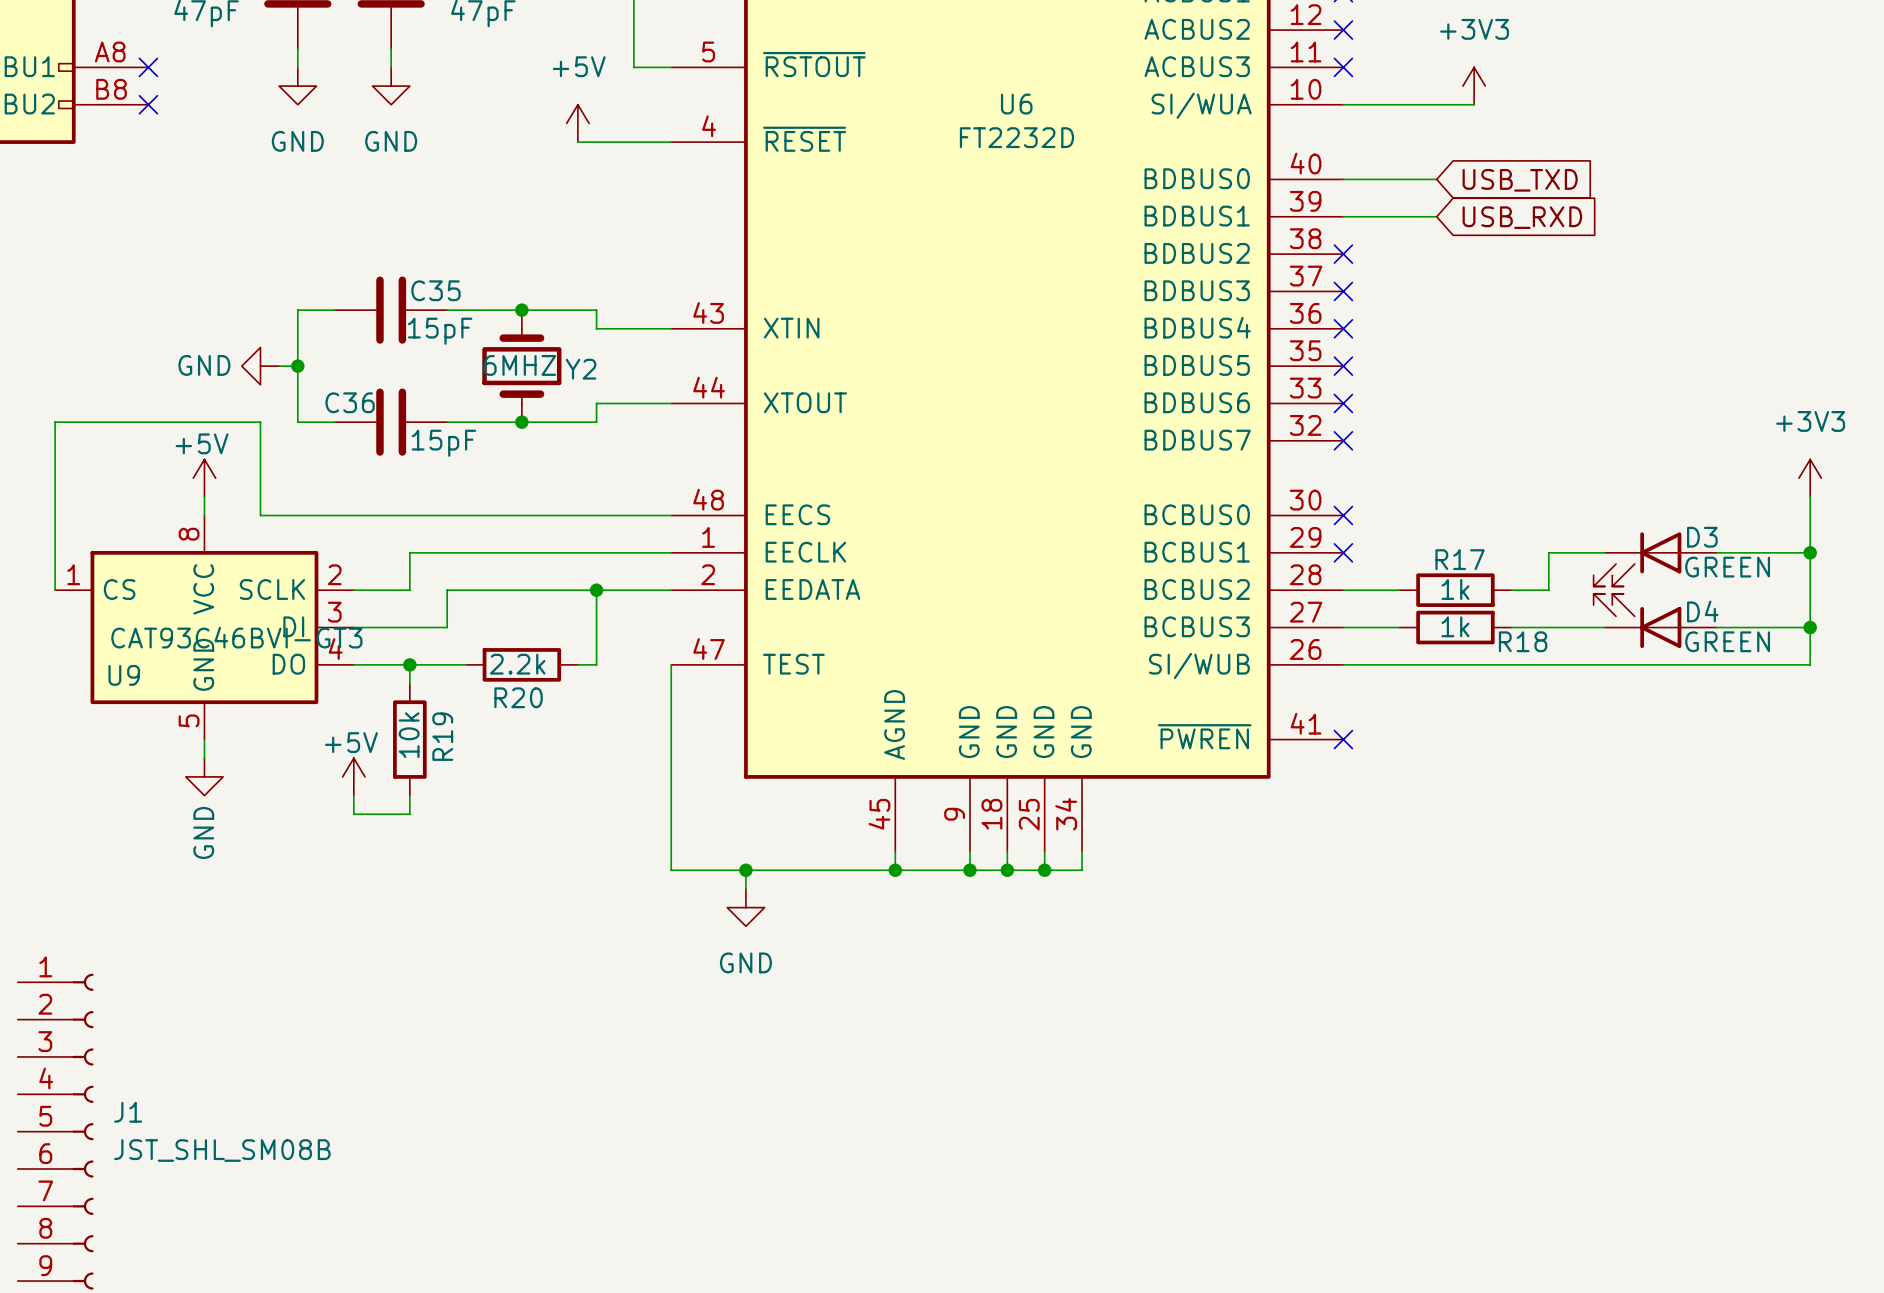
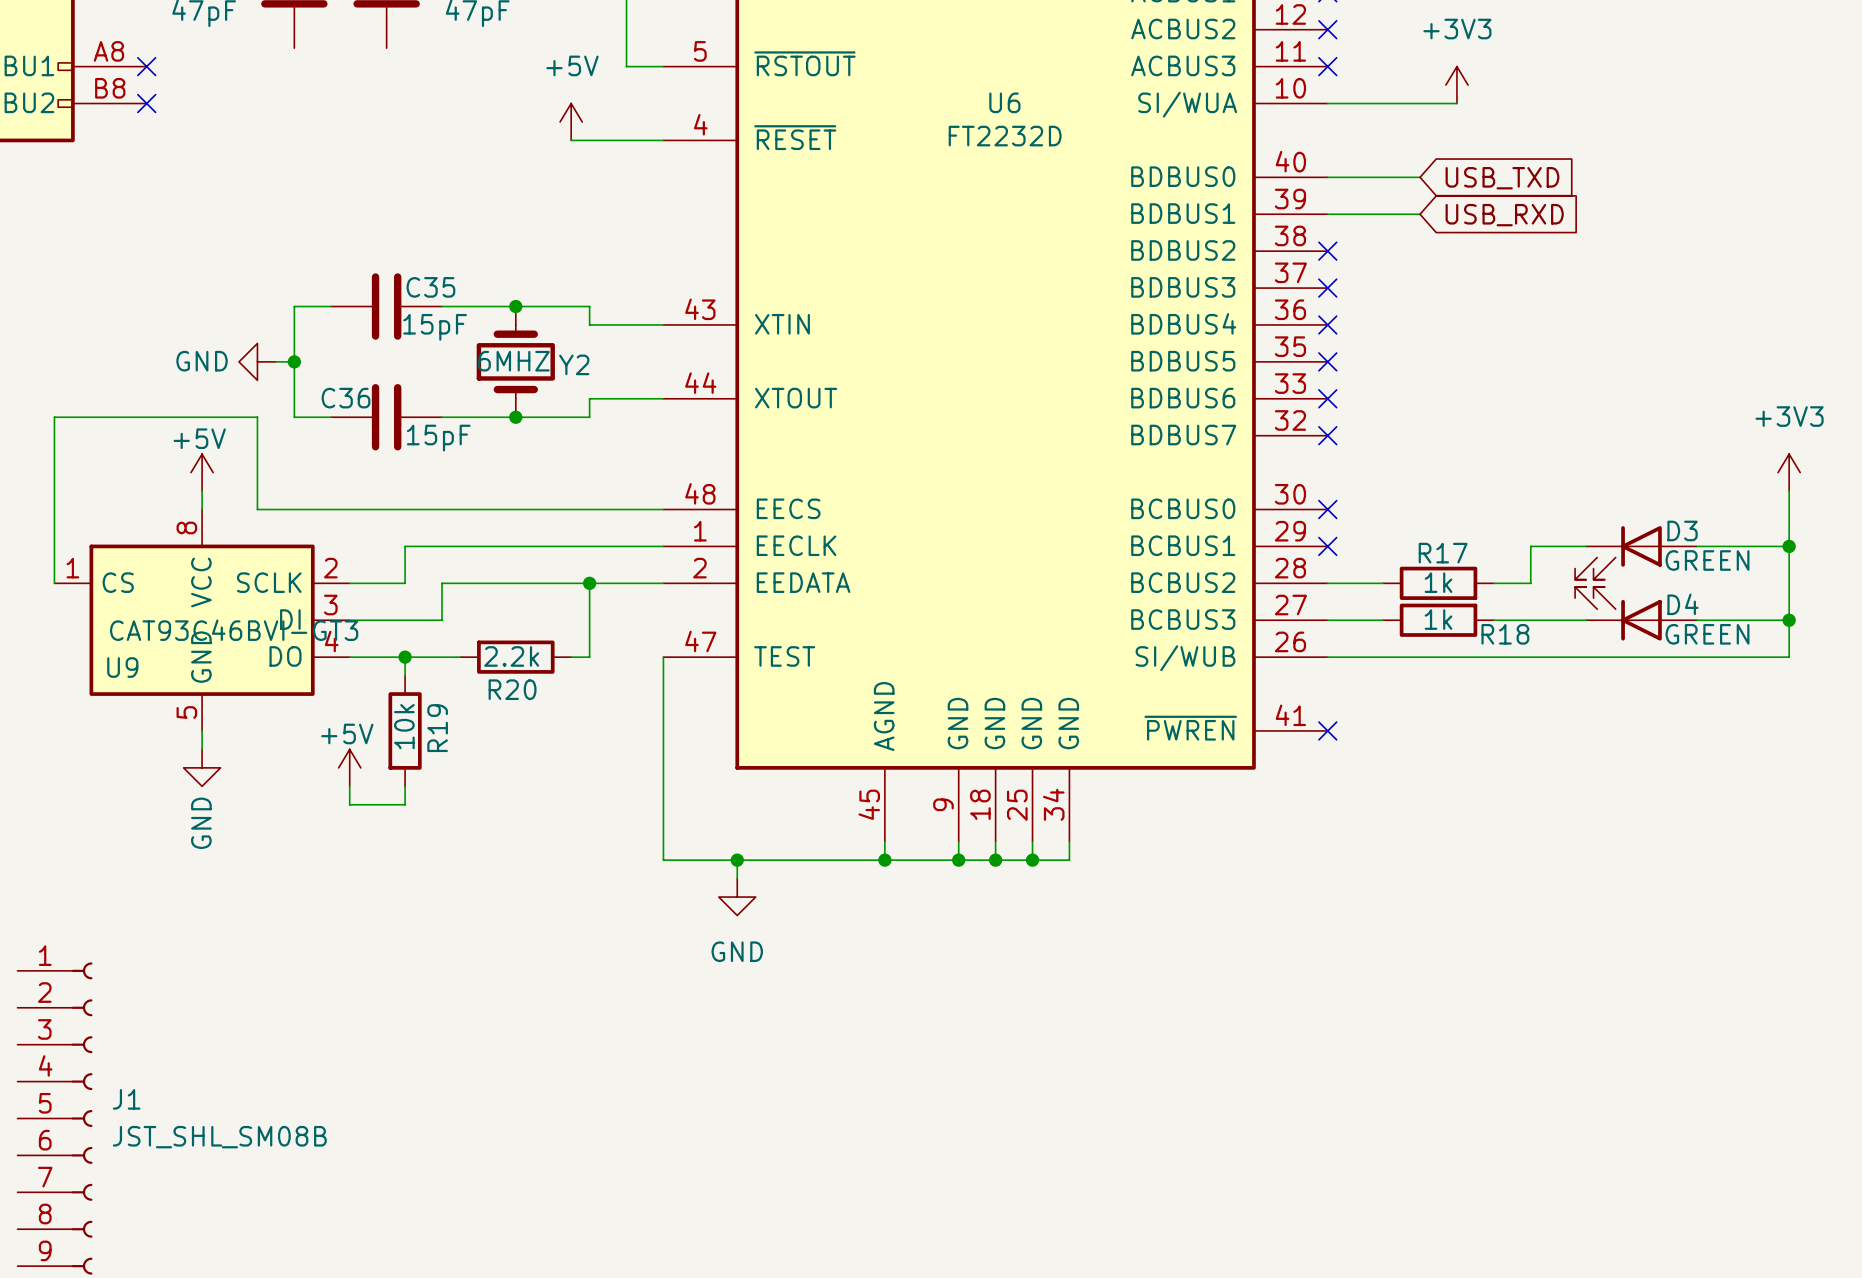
wire: (297, 48) (297, 67) -> none
wire: (391, 48) (391, 67) -> none
power symbol: GND (297, 86) -> none
power symbol: GND (391, 86) -> none

